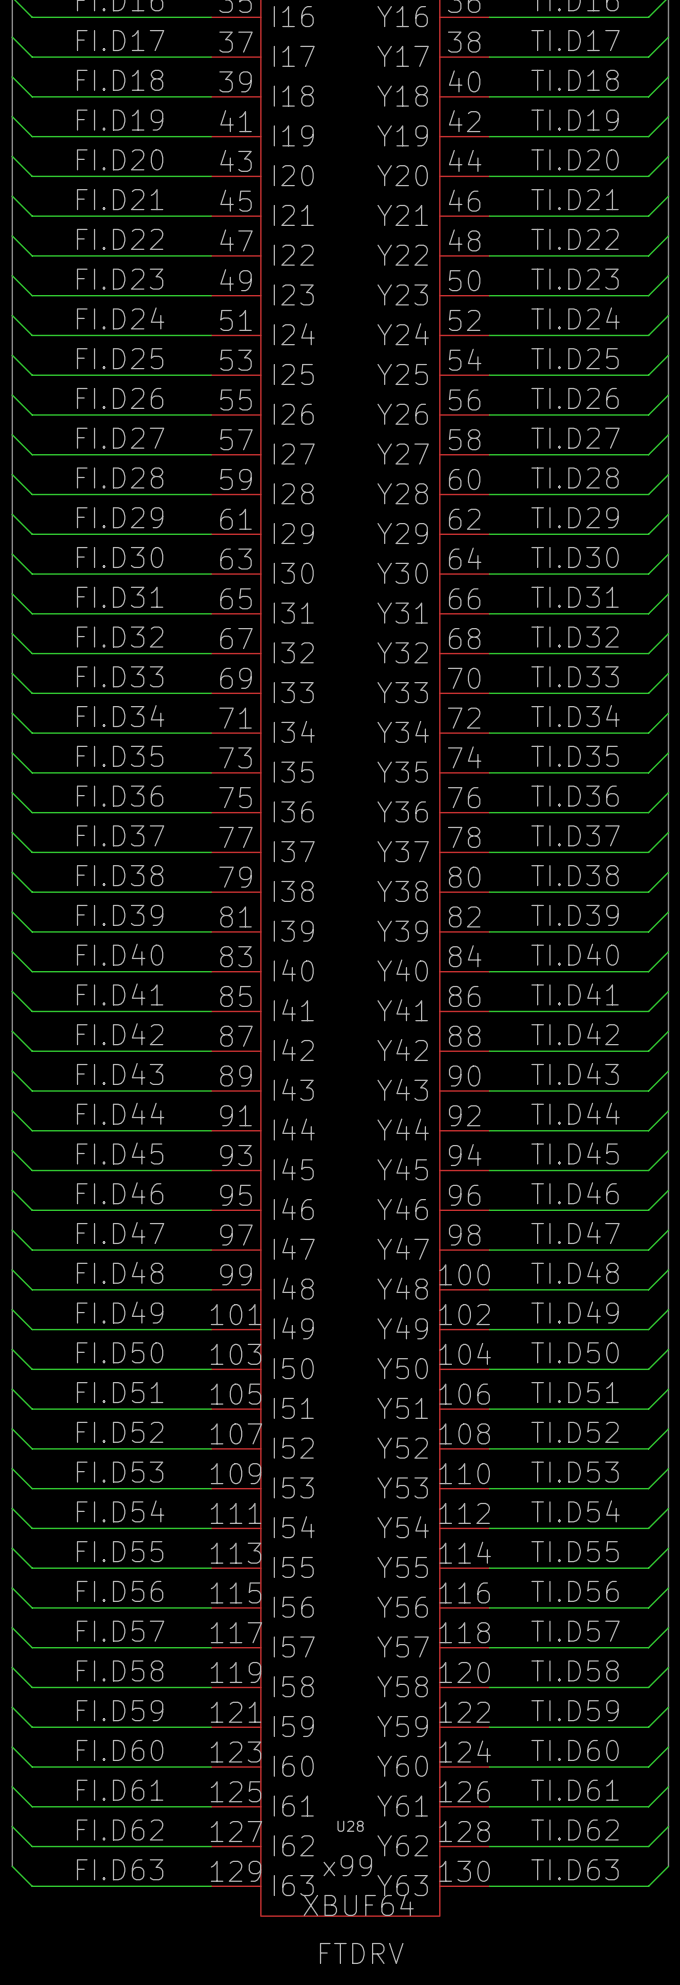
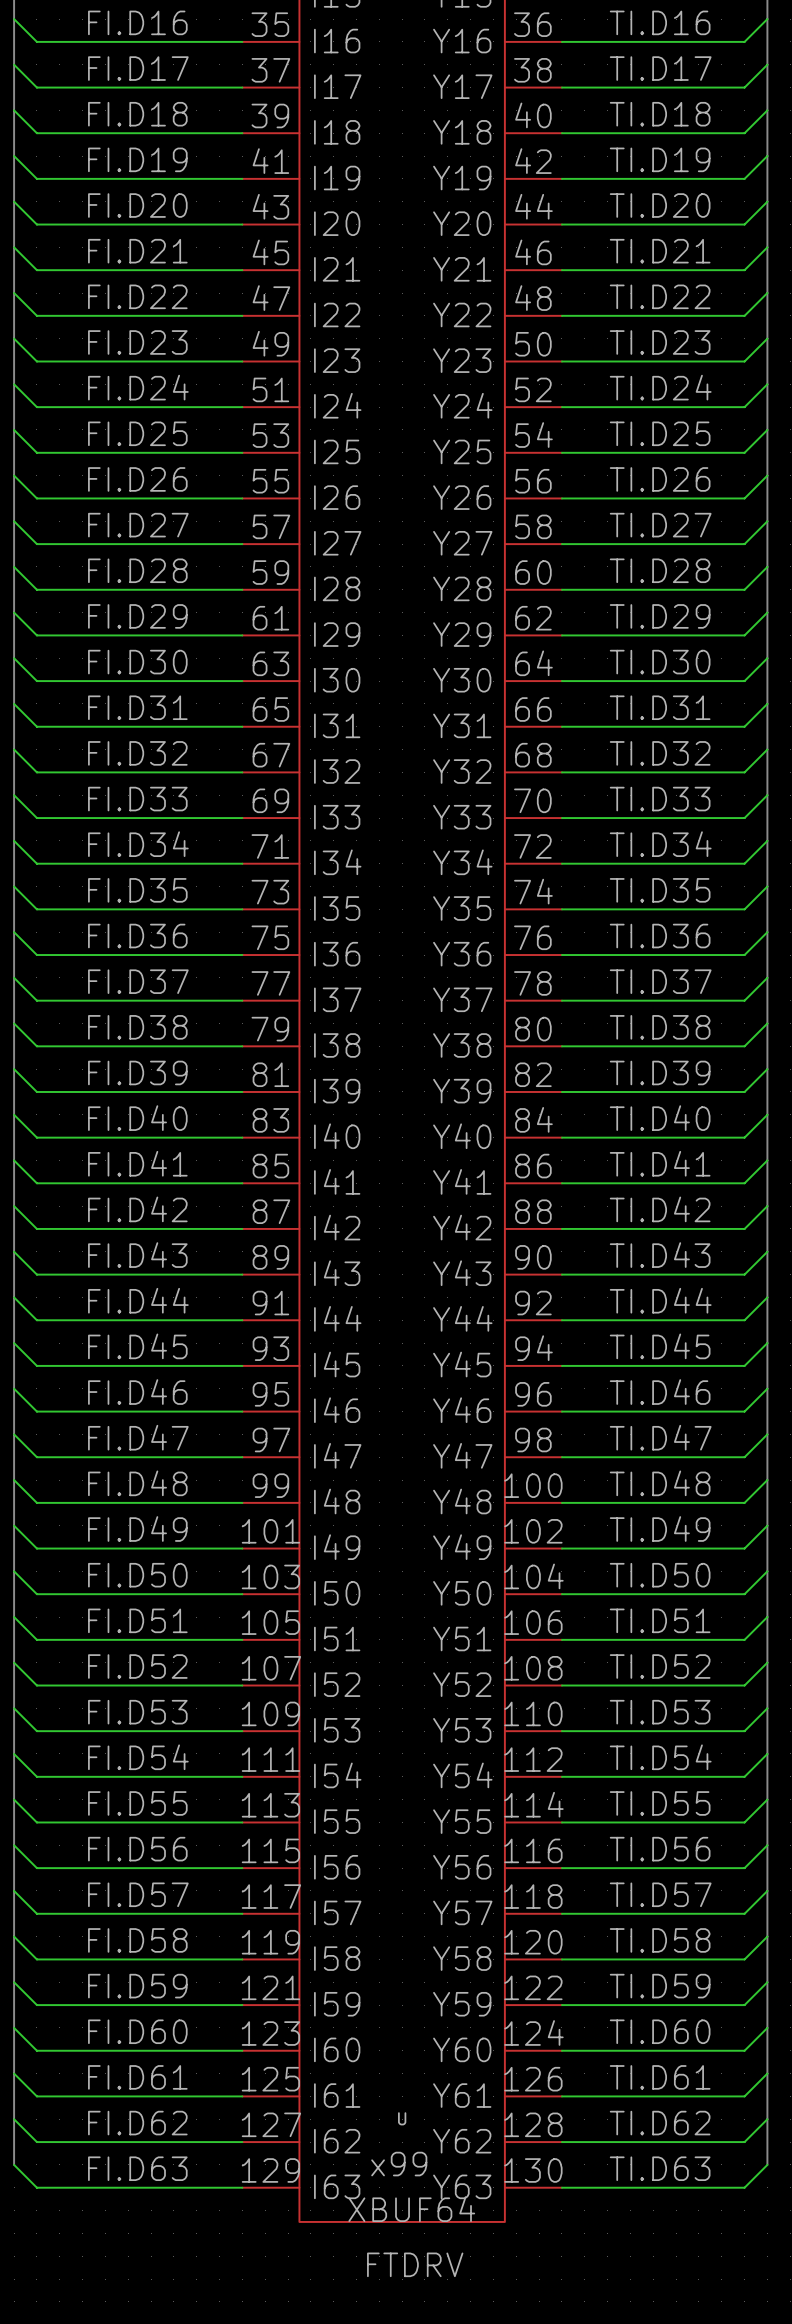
U28 name: U28 (350, 1826) -> U (402, 2118)

